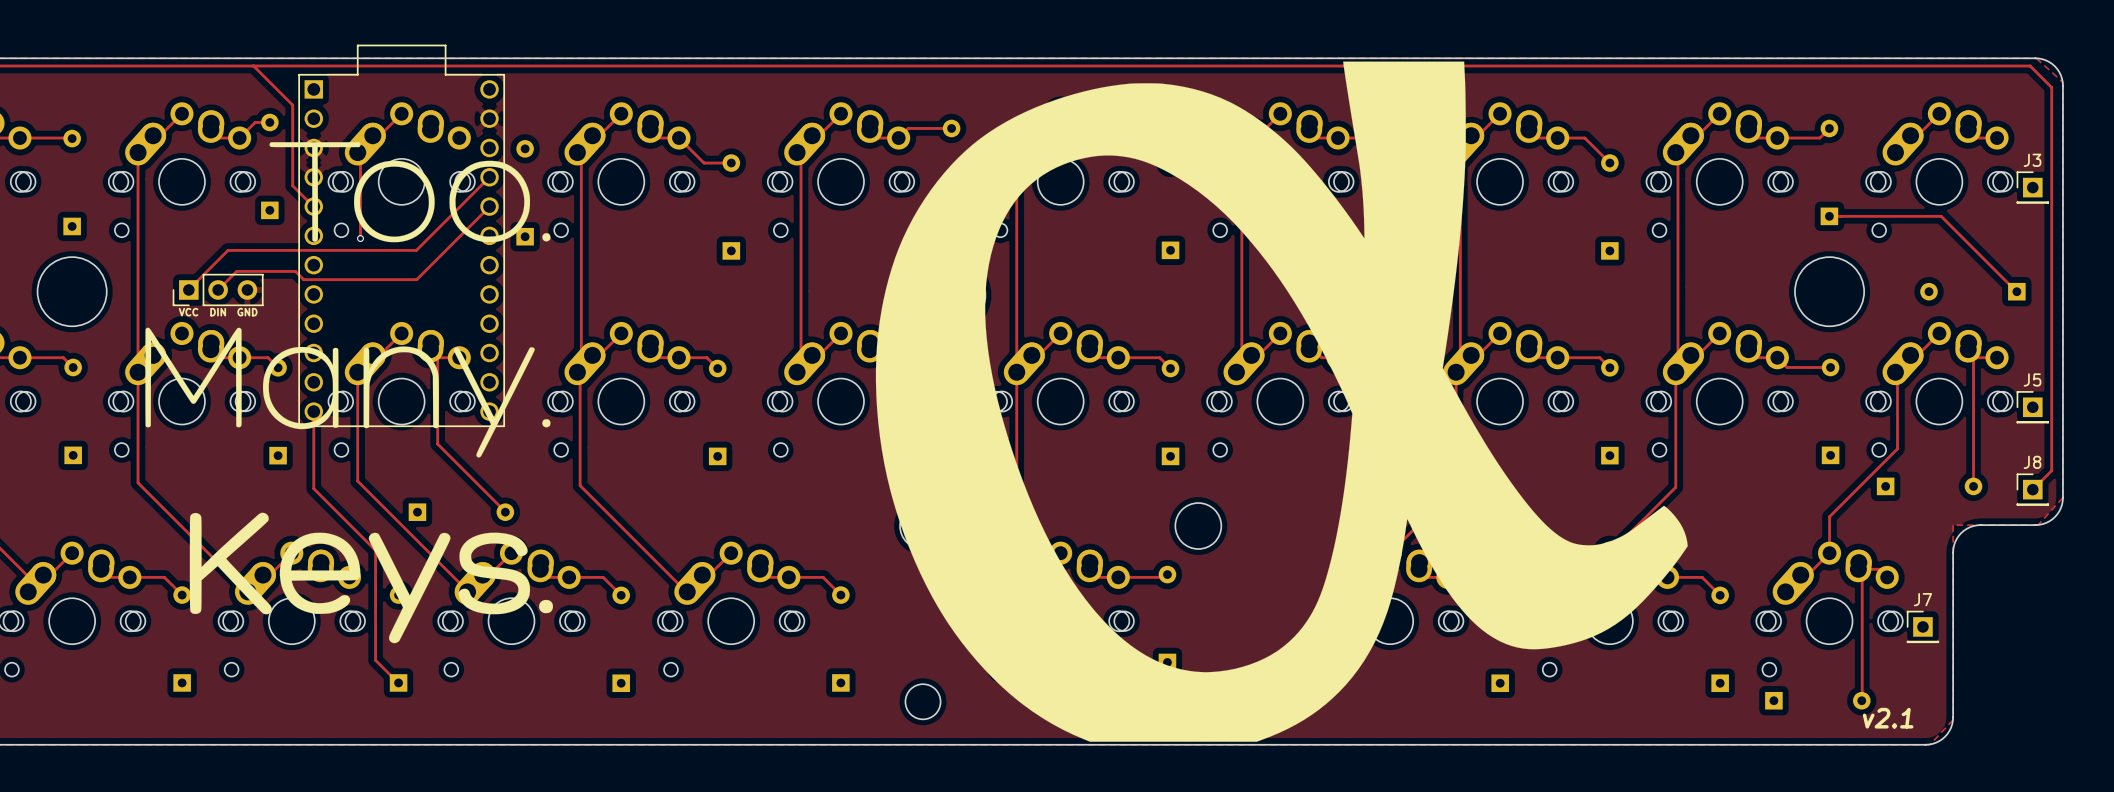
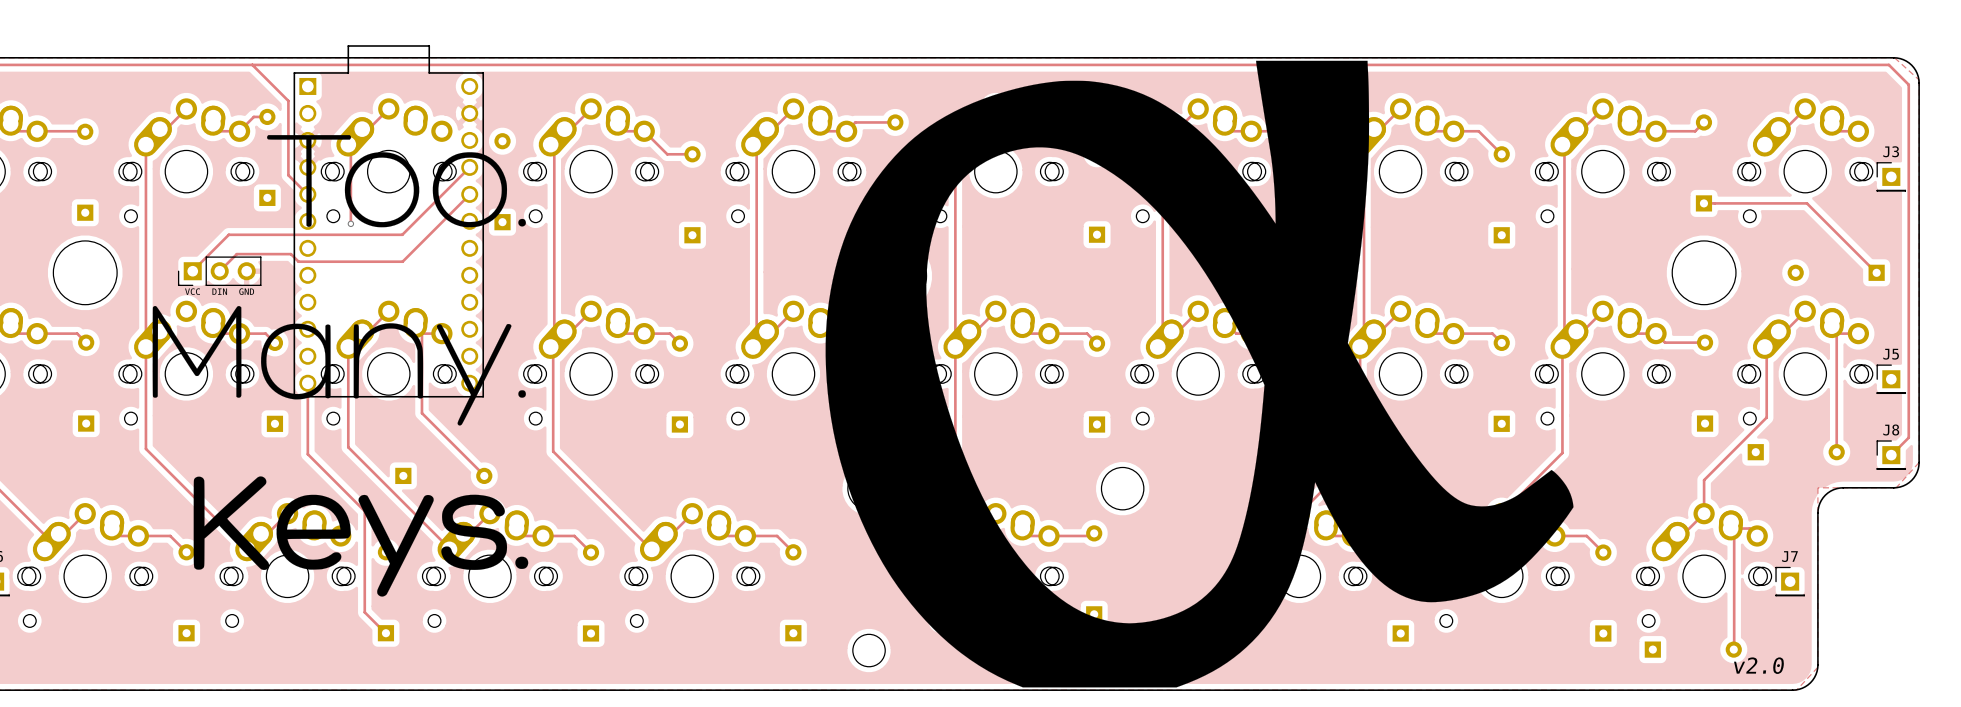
text: v2.1 (1888, 718) -> v2.0 (1759, 665)

